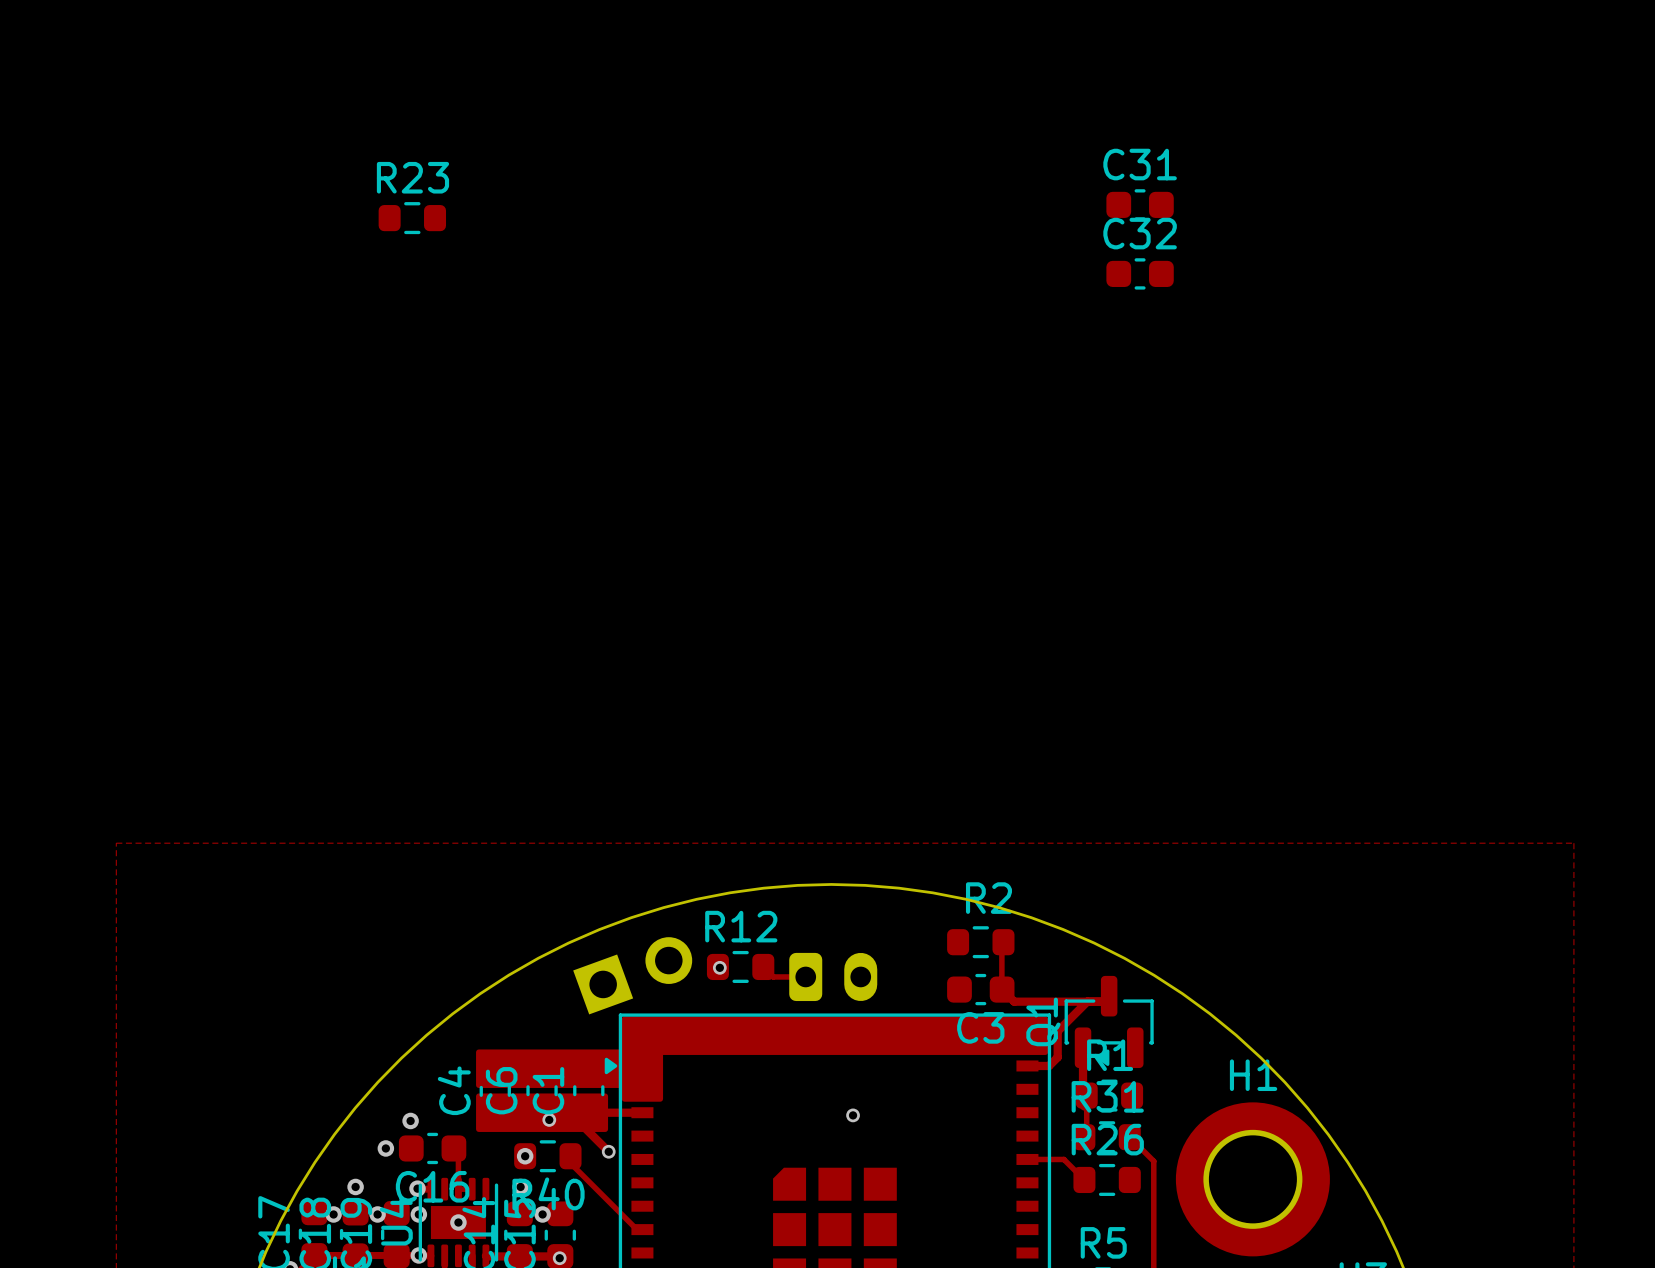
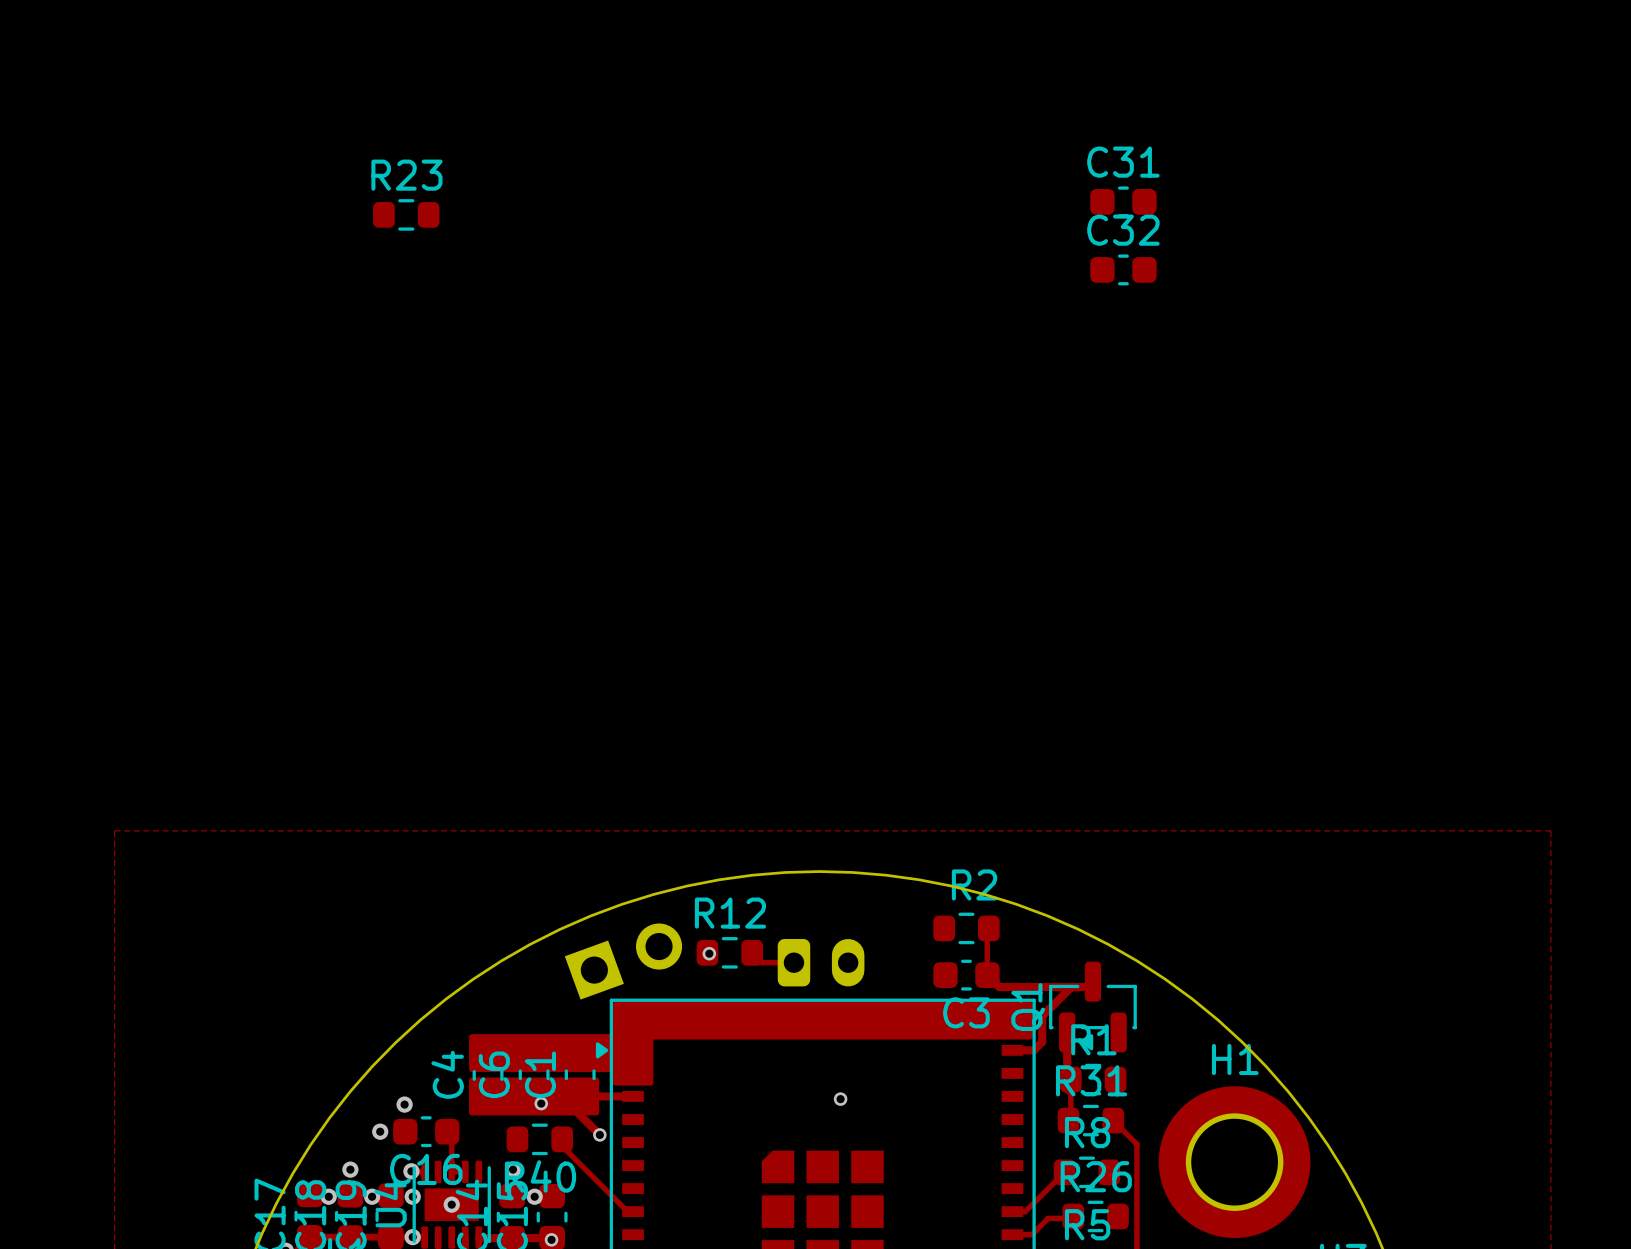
via: (525, 1156) -> none
track: (1027, 1159) (1063, 1159) (1084, 1179) -> none
R26 position: (1107, 1179) -> (1095, 1216)
track: none -> (1064, 1172) (1025, 1211) (1012, 1211)
R8: none -> (1086, 1172)
track: none -> (1064, 1218) (1048, 1218) (1031, 1234) (1012, 1234)

